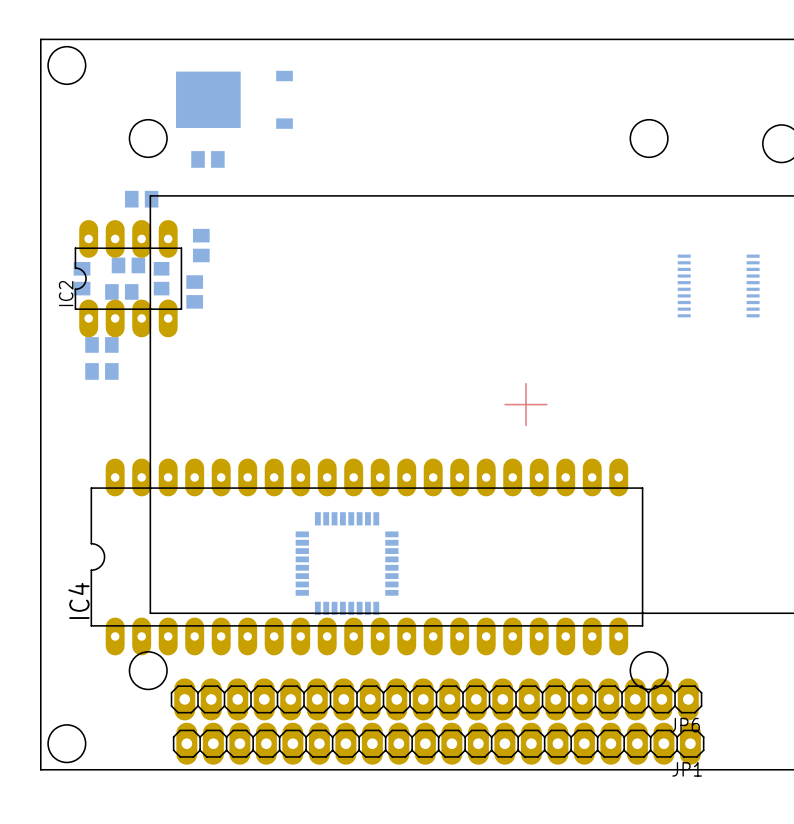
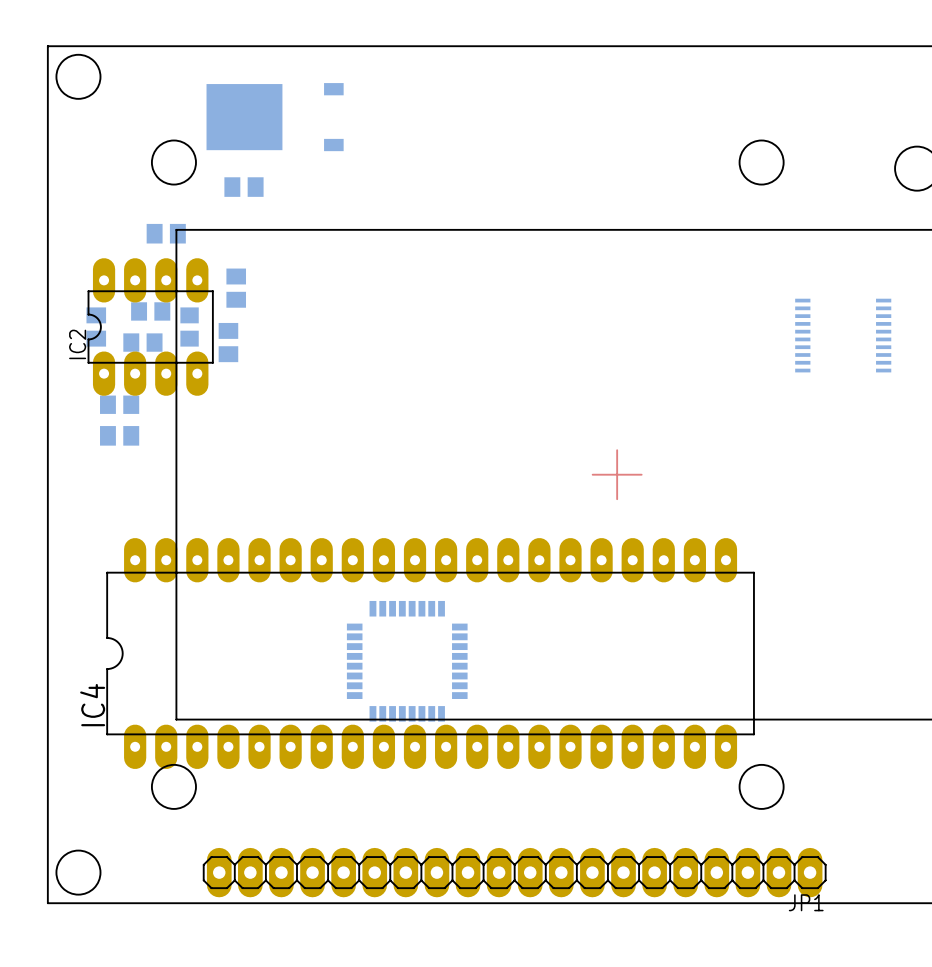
JP6: (436, 699) -> none

